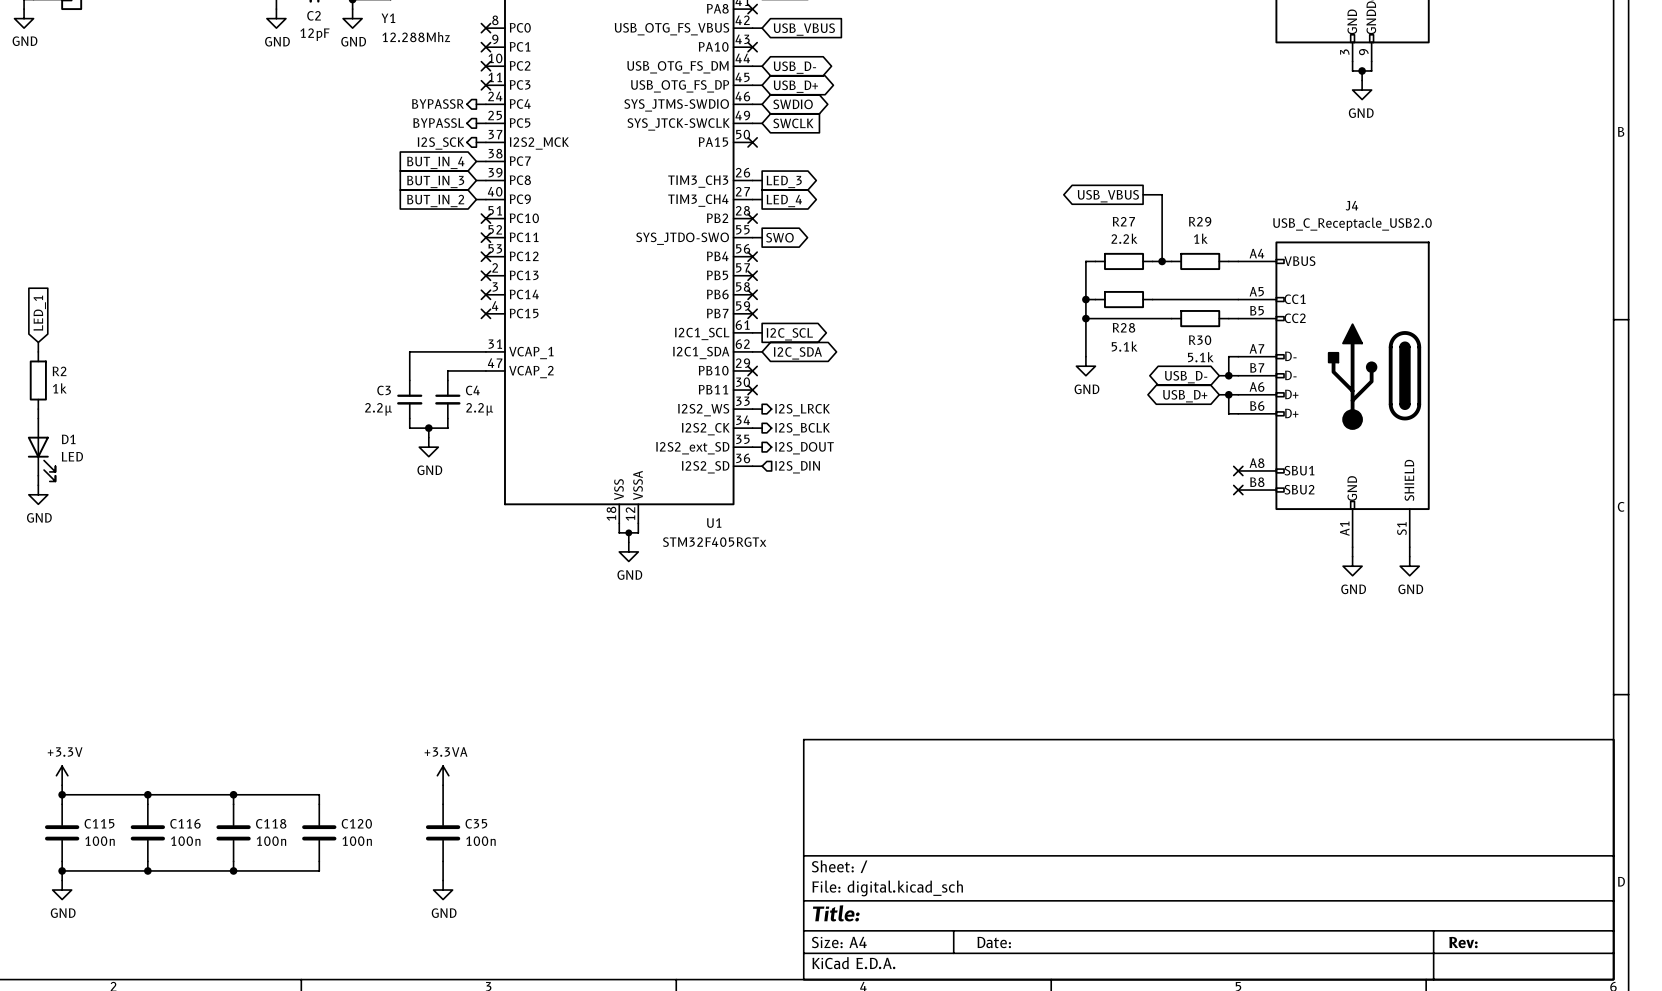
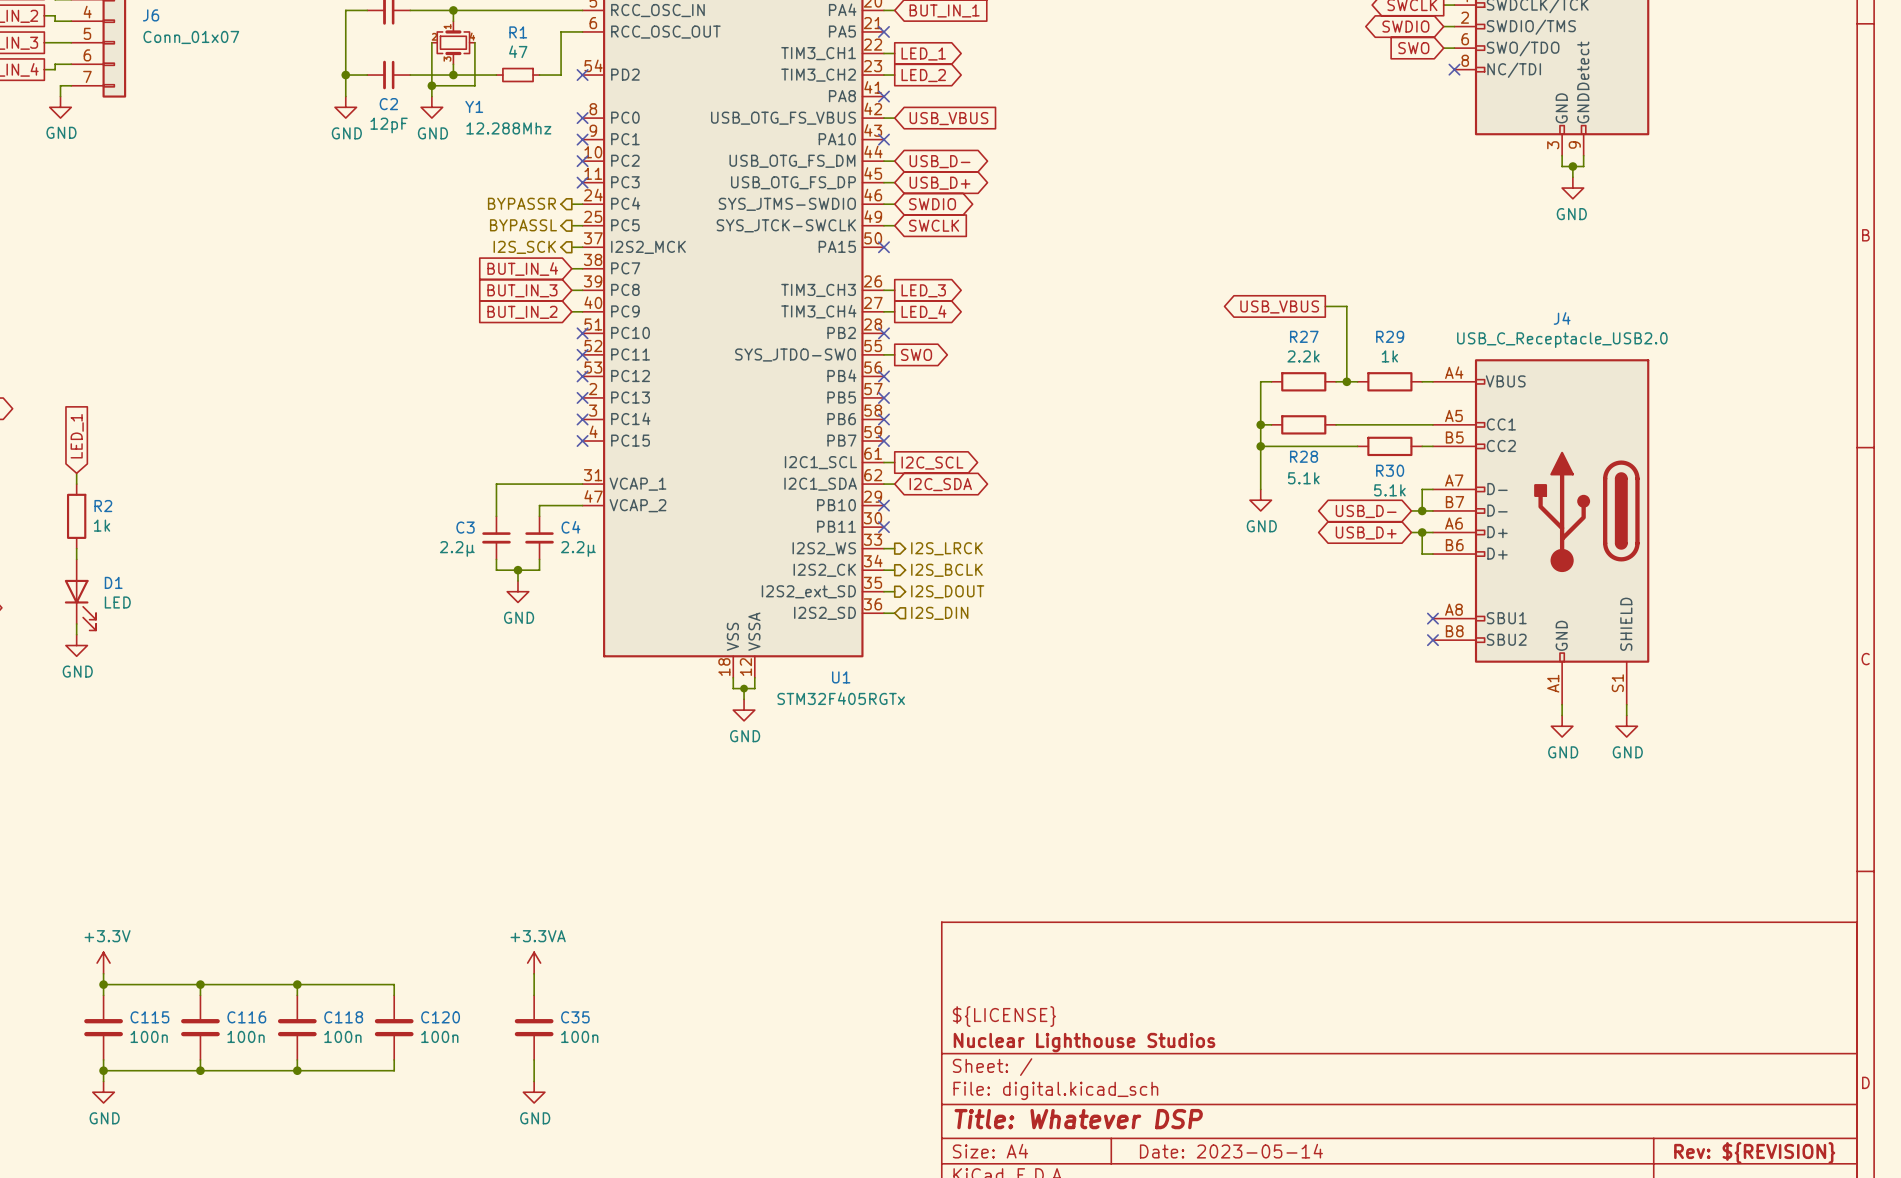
title block: none -> ${LICENSE} (1004, 1016)
title block: none -> Nuclear Lighthouse Studios (1084, 1042)
title block: Title: (836, 913) -> Title: Whatever DSP (1078, 1119)
title block: Date: (994, 942) -> Date: 2023-05-14 (1231, 1151)
title block: Rev: (1463, 942) -> Rev: ${REVISION} (1754, 1152)

